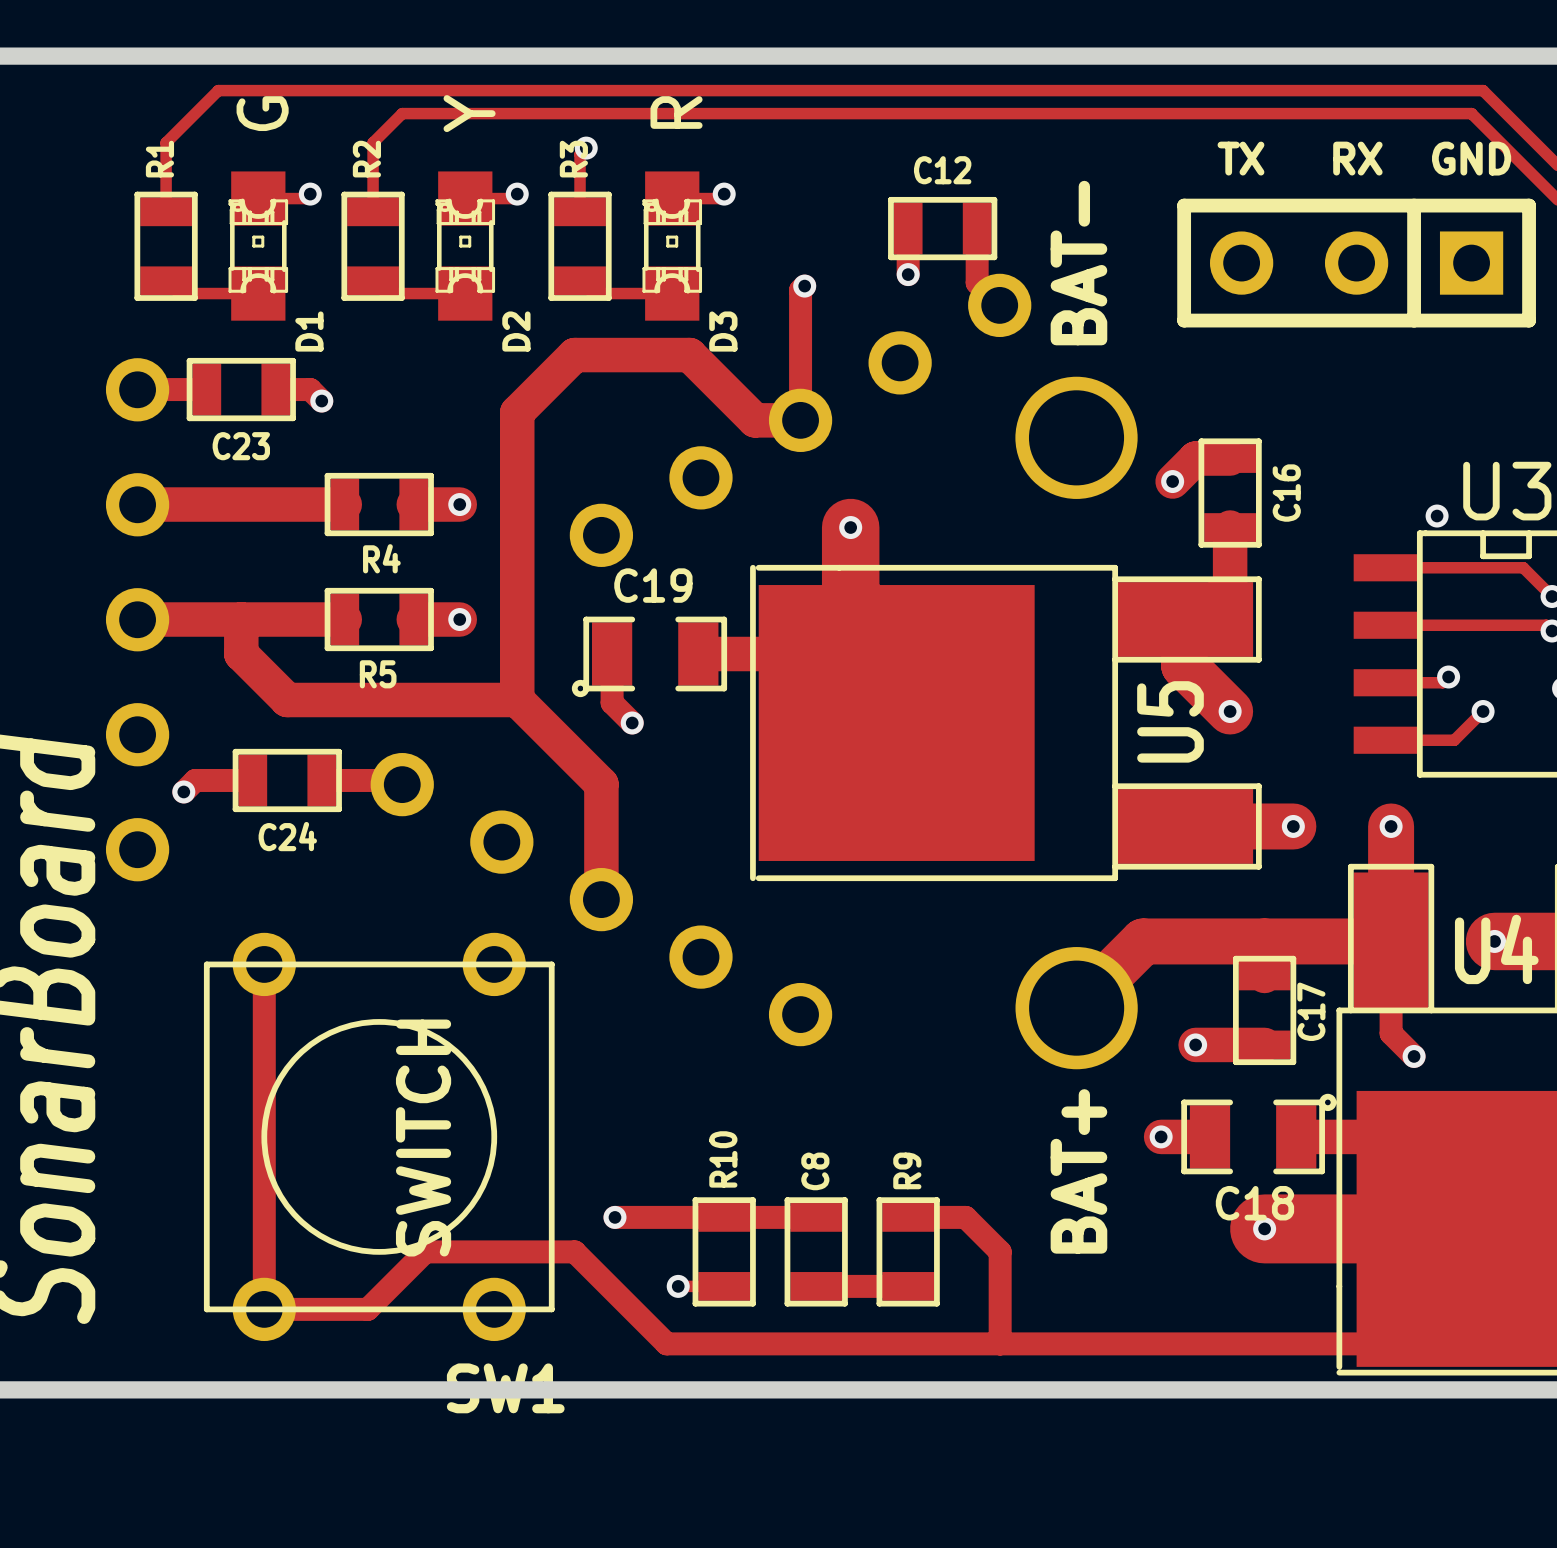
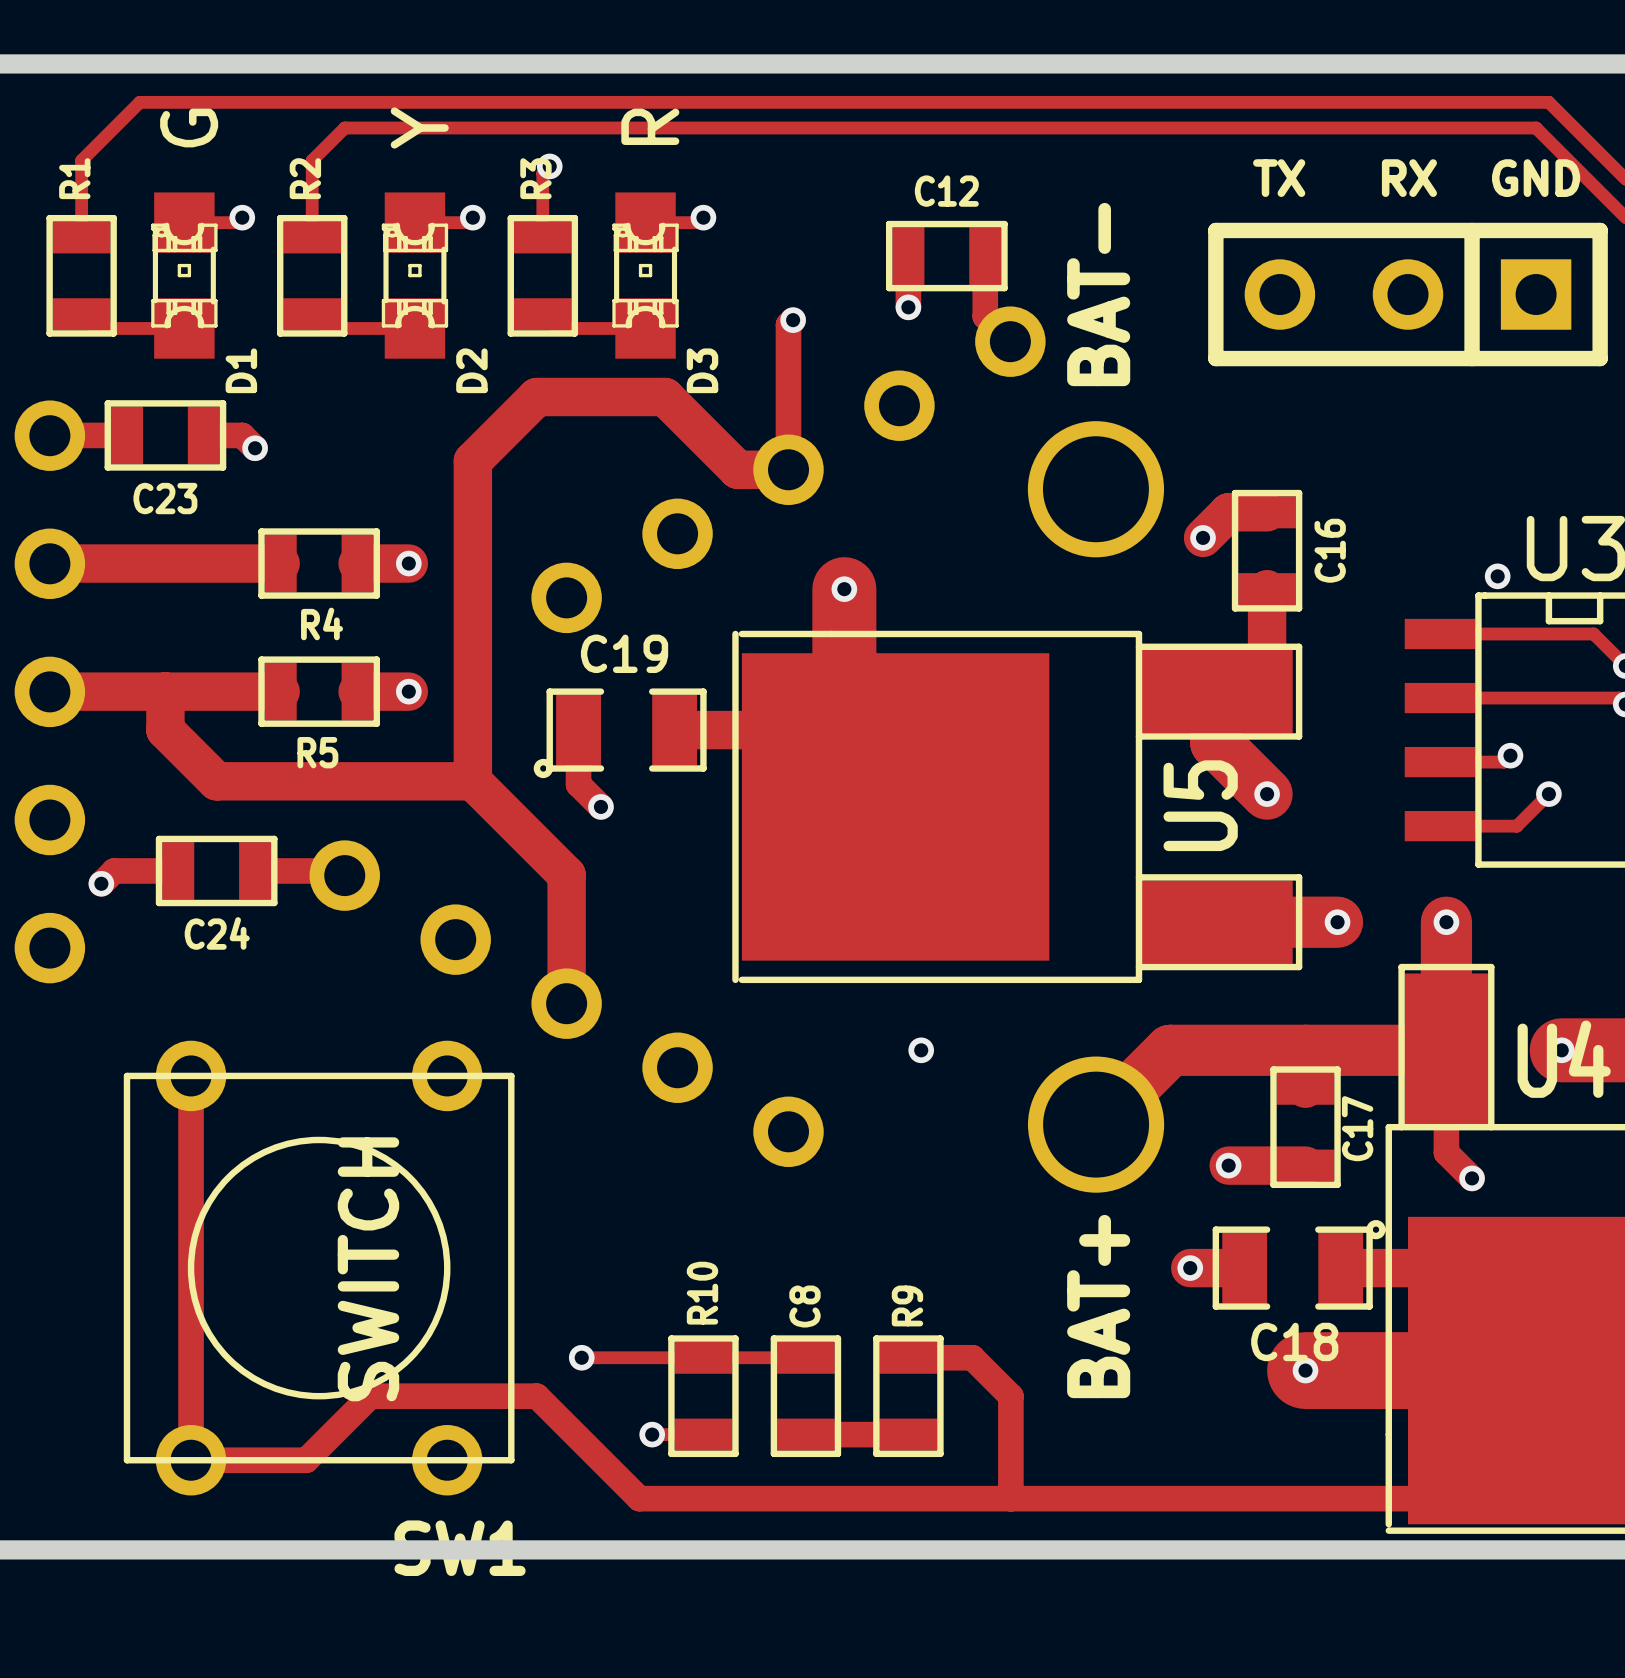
via: none -> (921, 1050)
track width: thick (614, 1217) (816, 1217) -> thin (581, 1357) (805, 1357)

